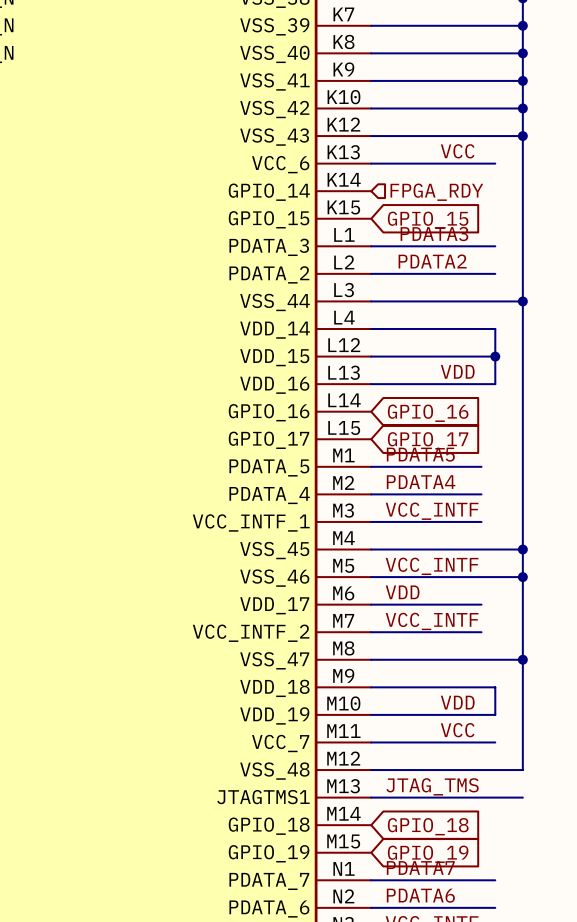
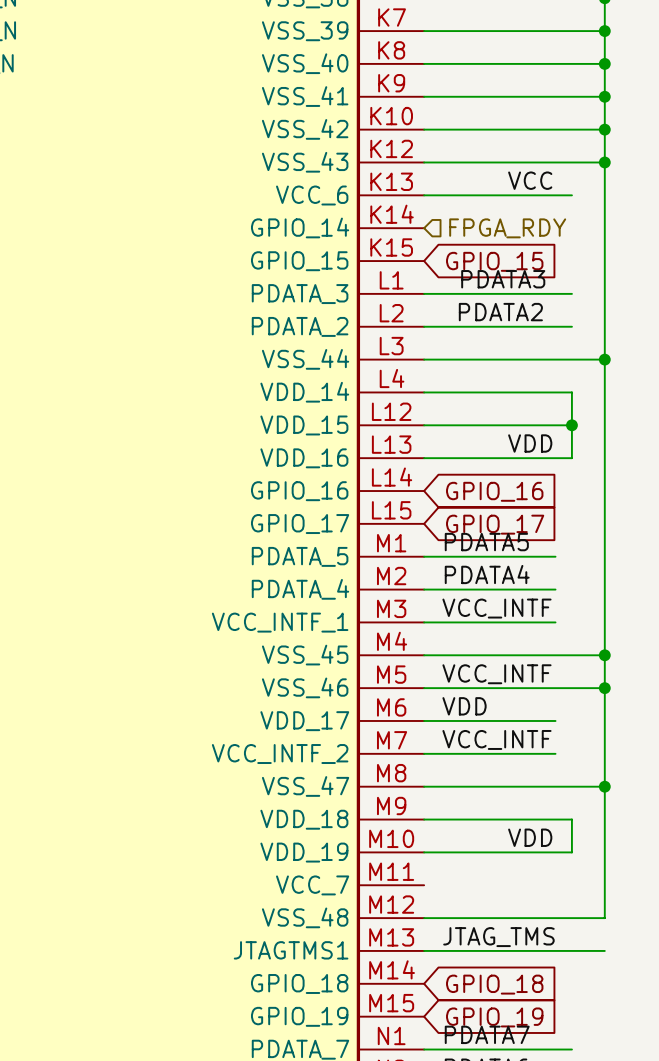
label: VCC (457, 730) -> none
wire: (371, 742) (495, 742) -> none

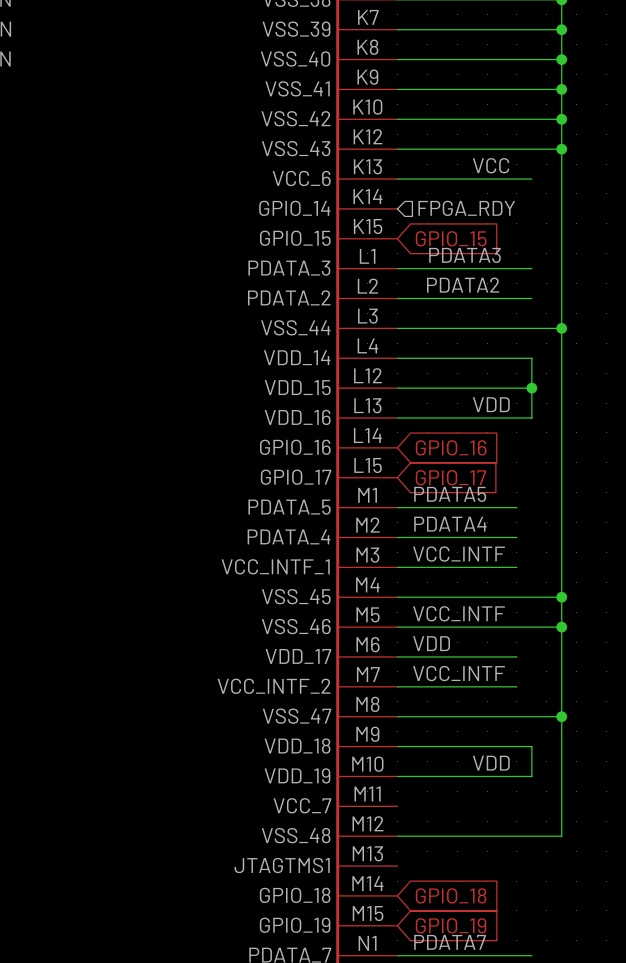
label: JTAG_TMS (498, 937) -> none
wire: (424, 950) (604, 950) -> none

